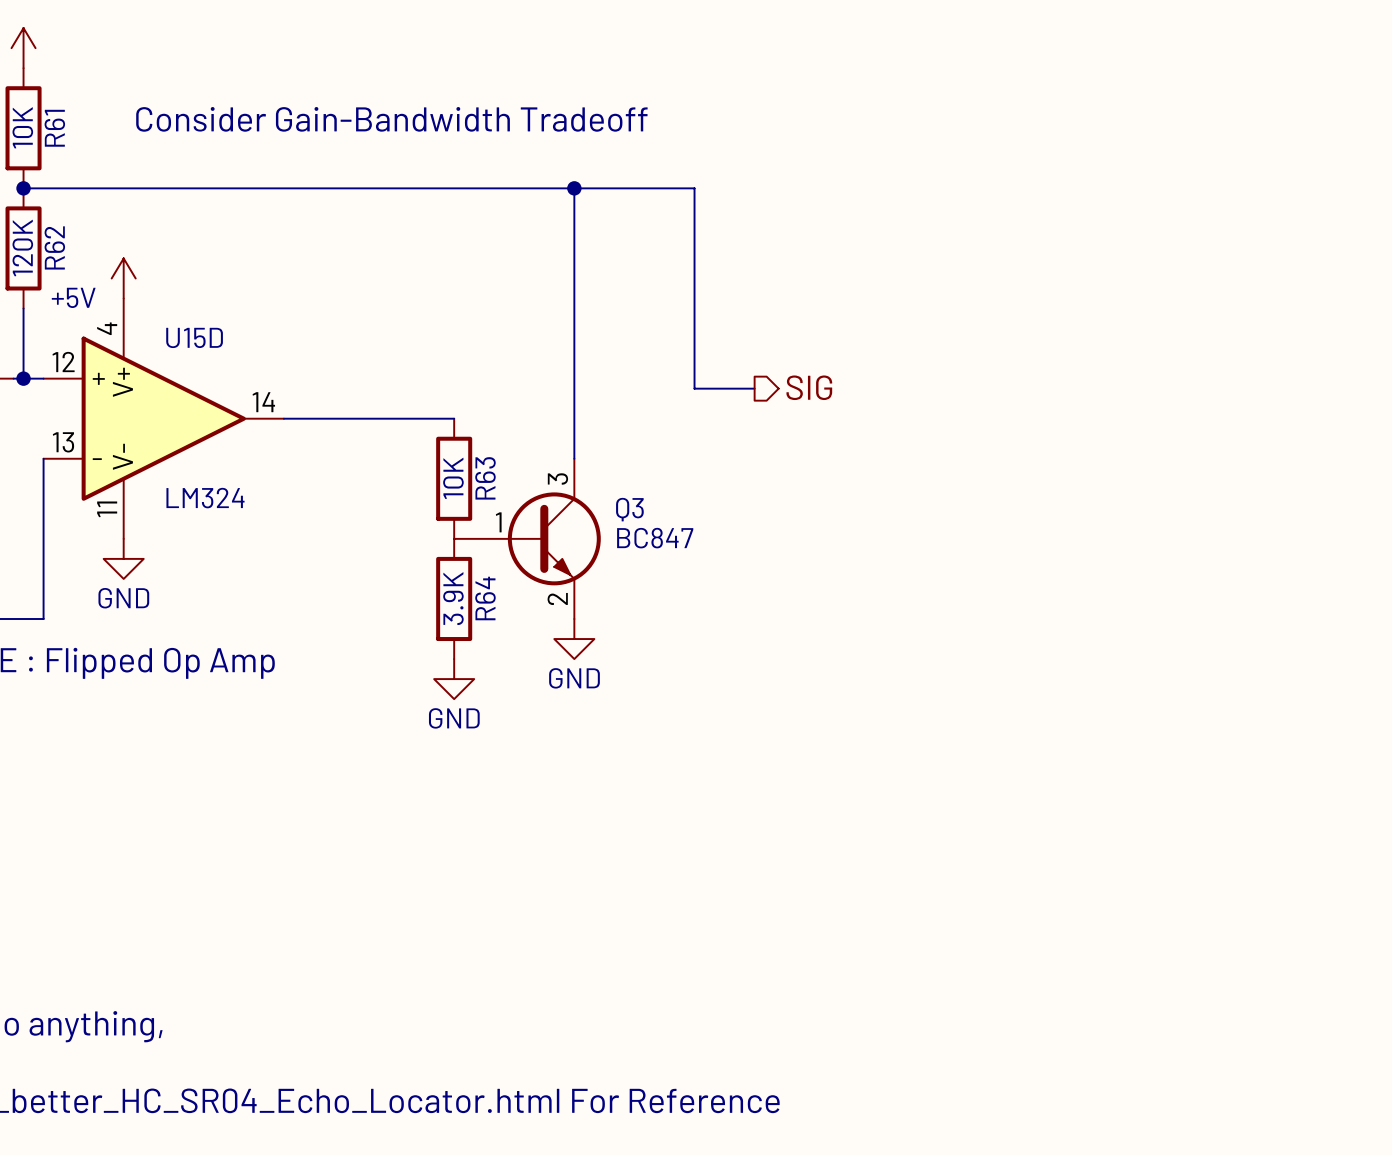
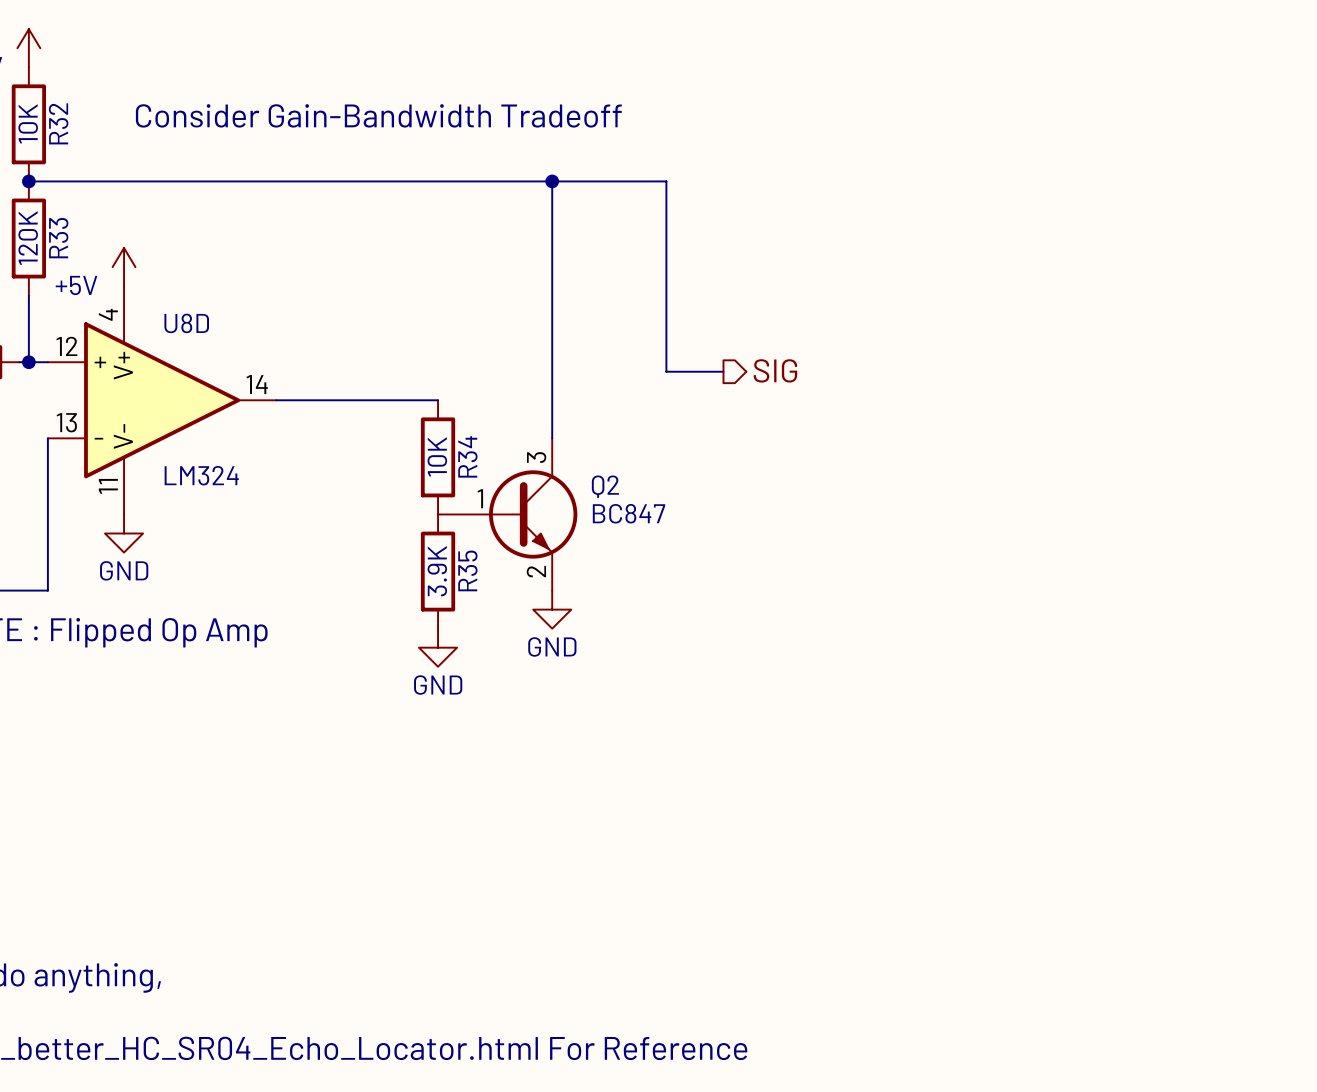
R61 name: R61 (54, 128) -> R32 (58, 123)
R62 name: R62 (54, 247) -> R33 (58, 238)
U15D name: U15D (194, 337) -> U8D (186, 323)
R63 name: R63 (485, 478) -> R34 (467, 456)
Q3 name: Q3 (629, 509) -> Q2 (605, 486)
R64 name: R64 (485, 598) -> R35 (467, 570)

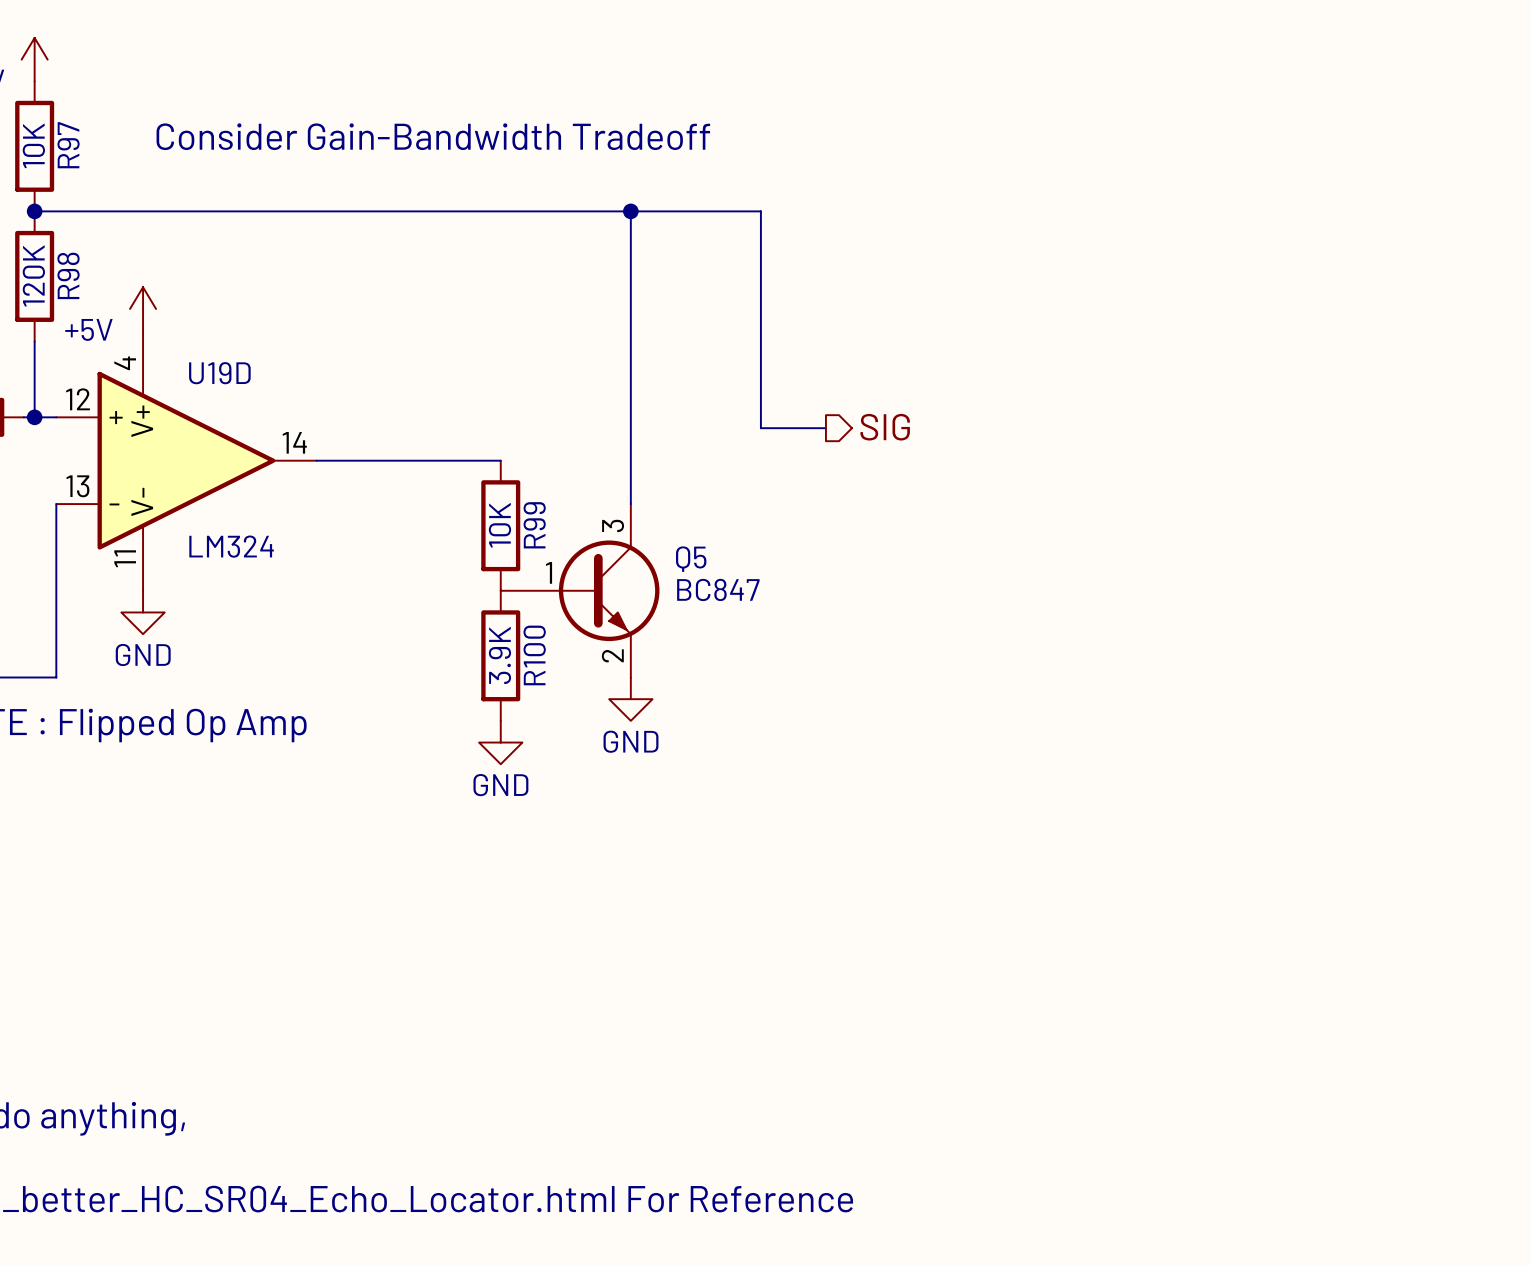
R32 name: R32 (58, 123) -> R97 (68, 145)
R33 name: R33 (58, 238) -> R98 (68, 275)
U8D name: U8D (186, 323) -> U19D (219, 373)
R34 name: R34 (467, 456) -> R99 (534, 525)
Q2 name: Q2 (605, 486) -> Q5 (691, 559)
R35 name: R35 (467, 570) -> R100 (534, 655)

